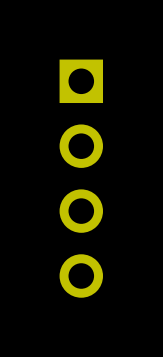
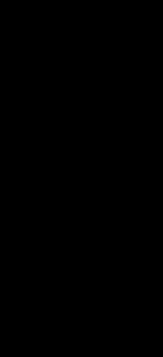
part: (81, 178) -> none

